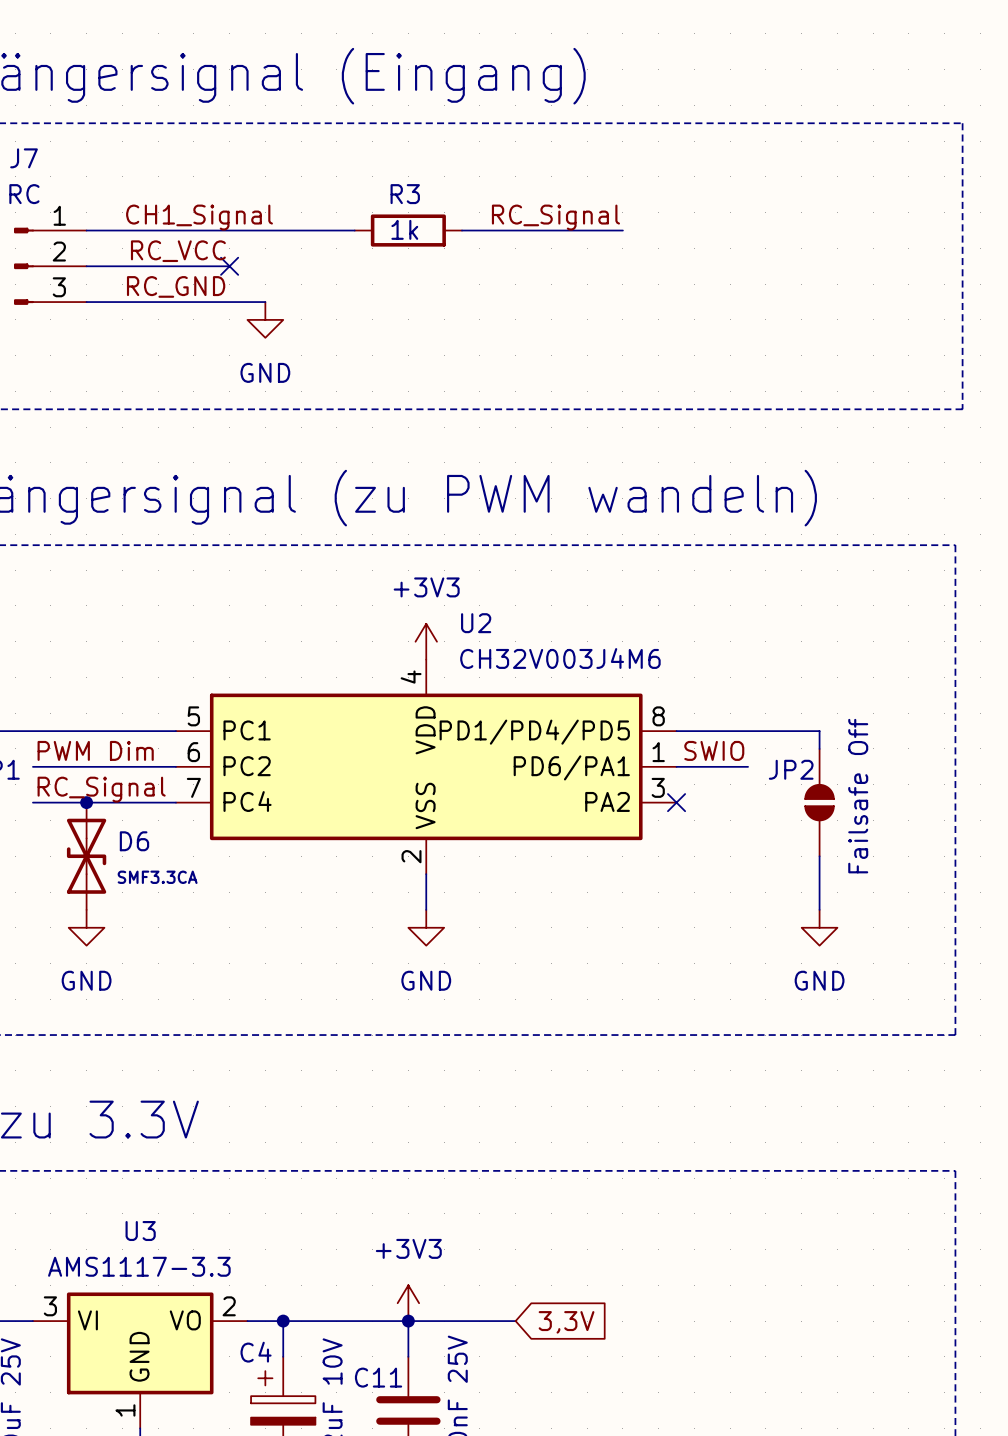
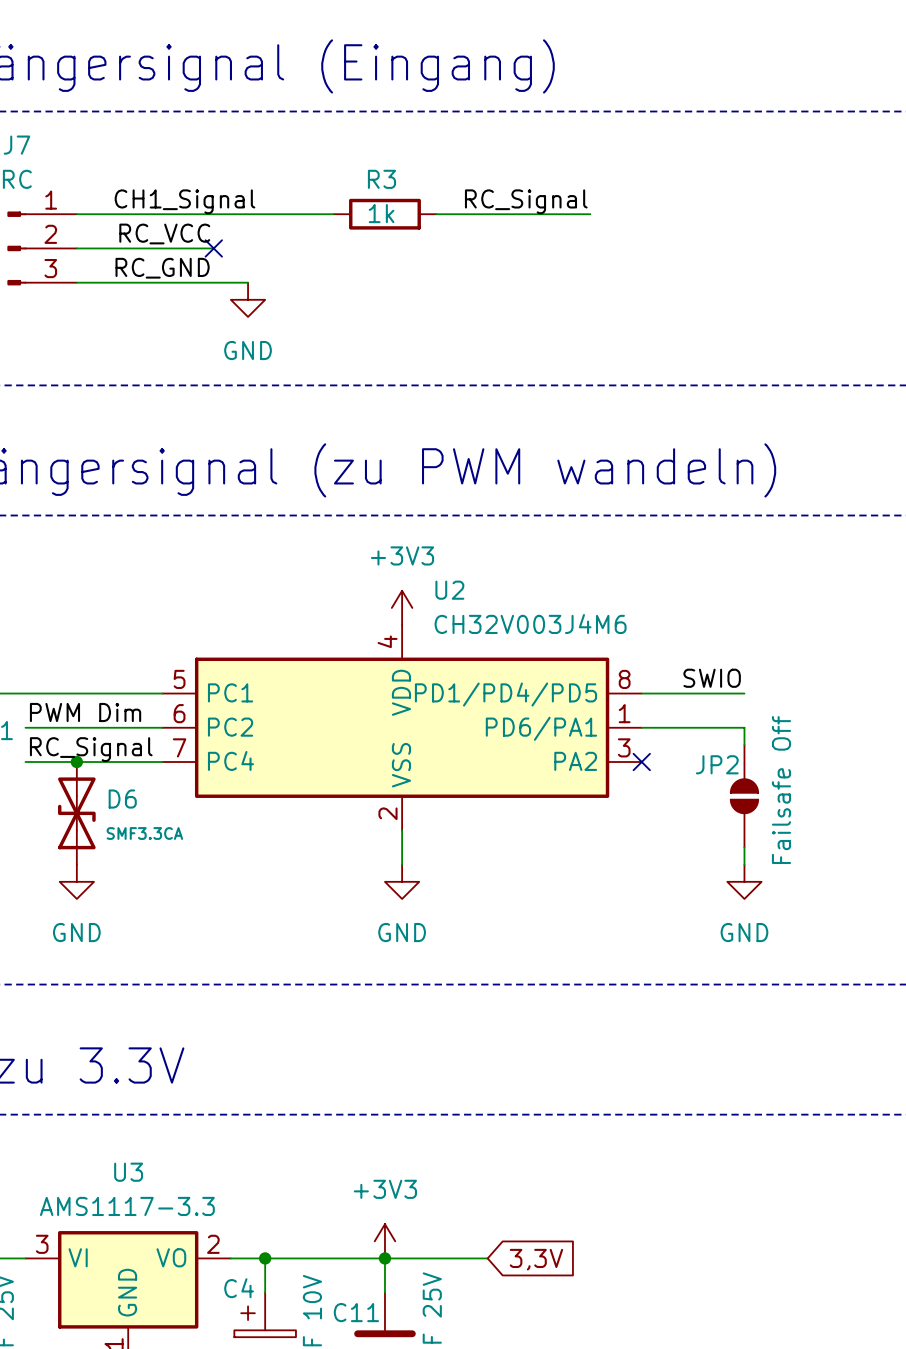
wire: (783, 731) (819, 731) (819, 748) -> (710, 727) (744, 727) (744, 744)
label position: SWIO (714, 750) -> SWIO (712, 678)
JP2 position: (819, 802) -> (744, 796)
wire: (819, 856) (819, 909) -> none
wire: none -> (744, 847) (744, 864)
power symbol position: GND (819, 927) -> GND (744, 881)

